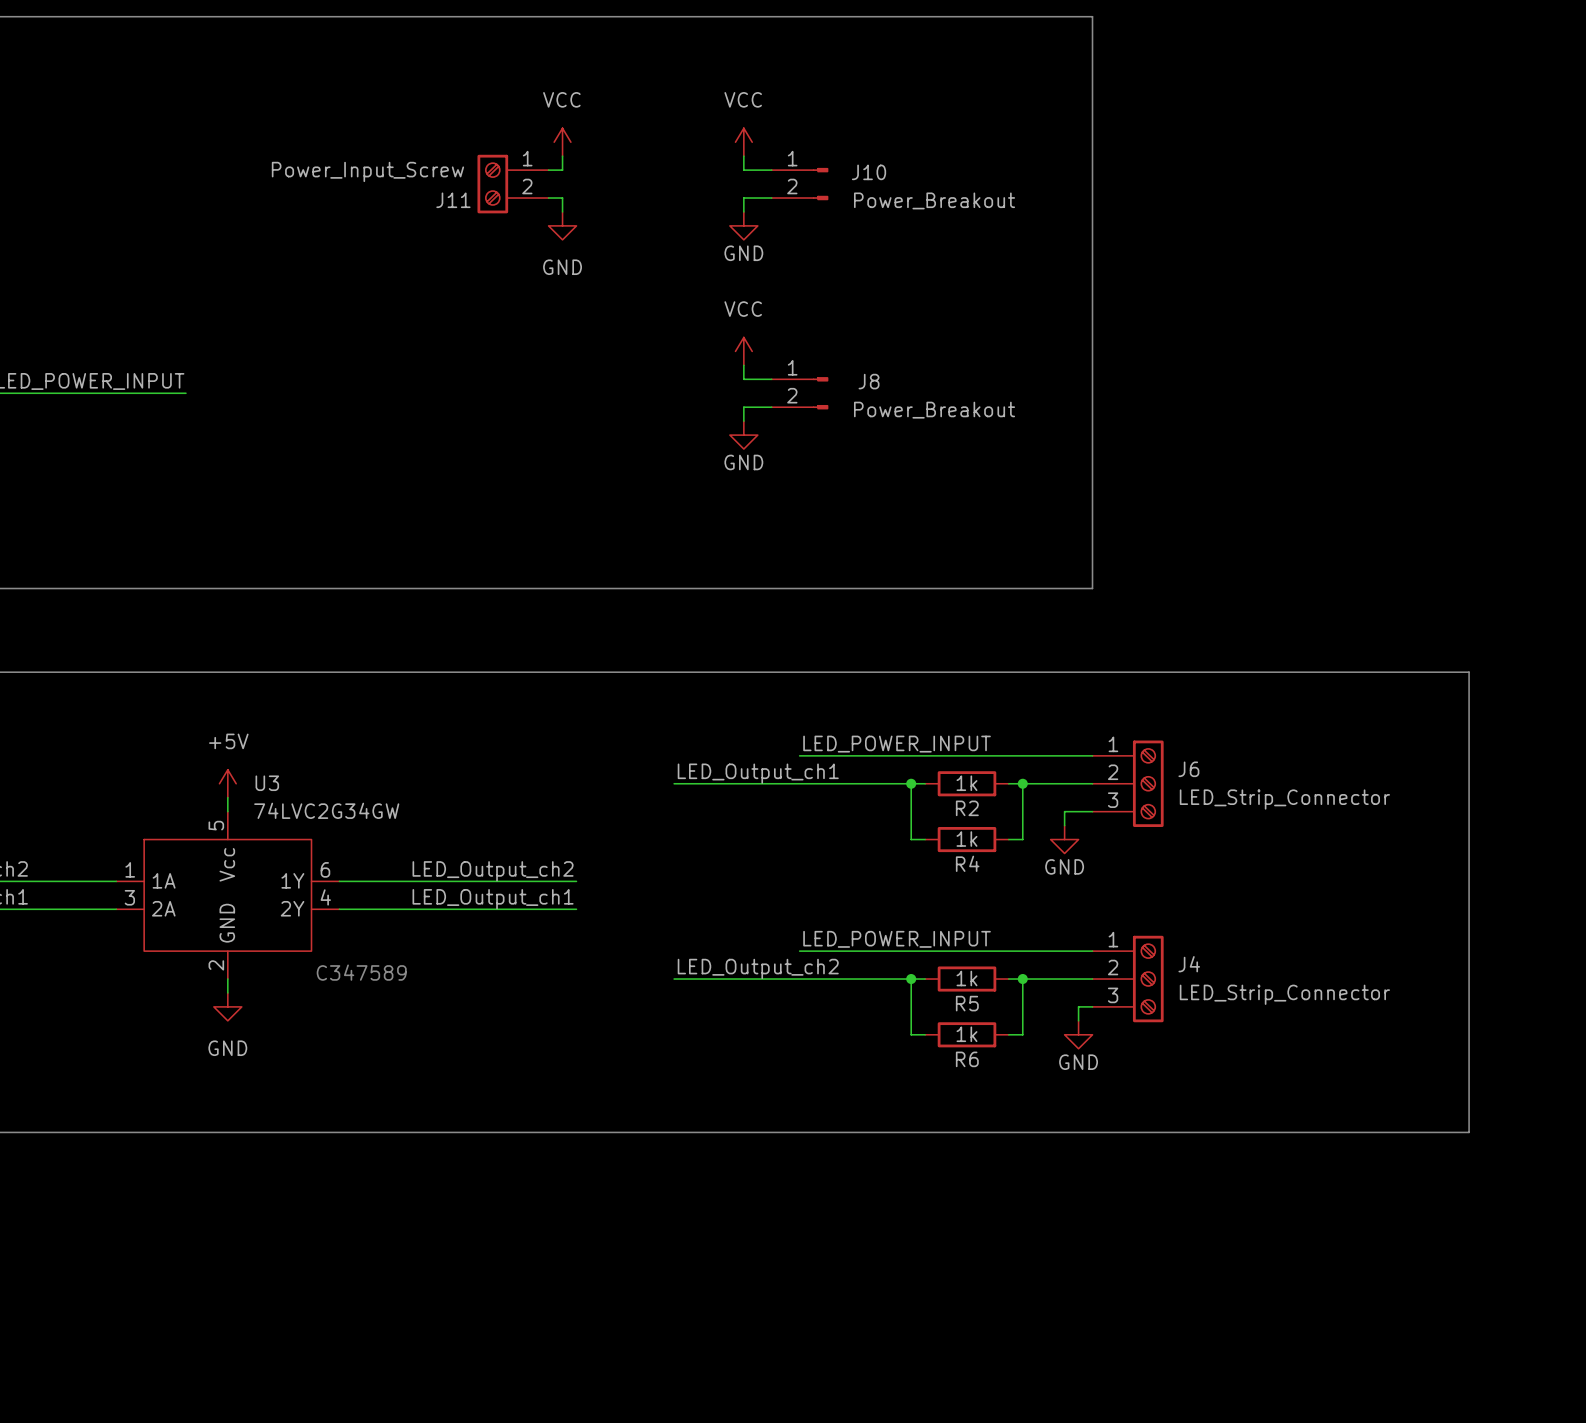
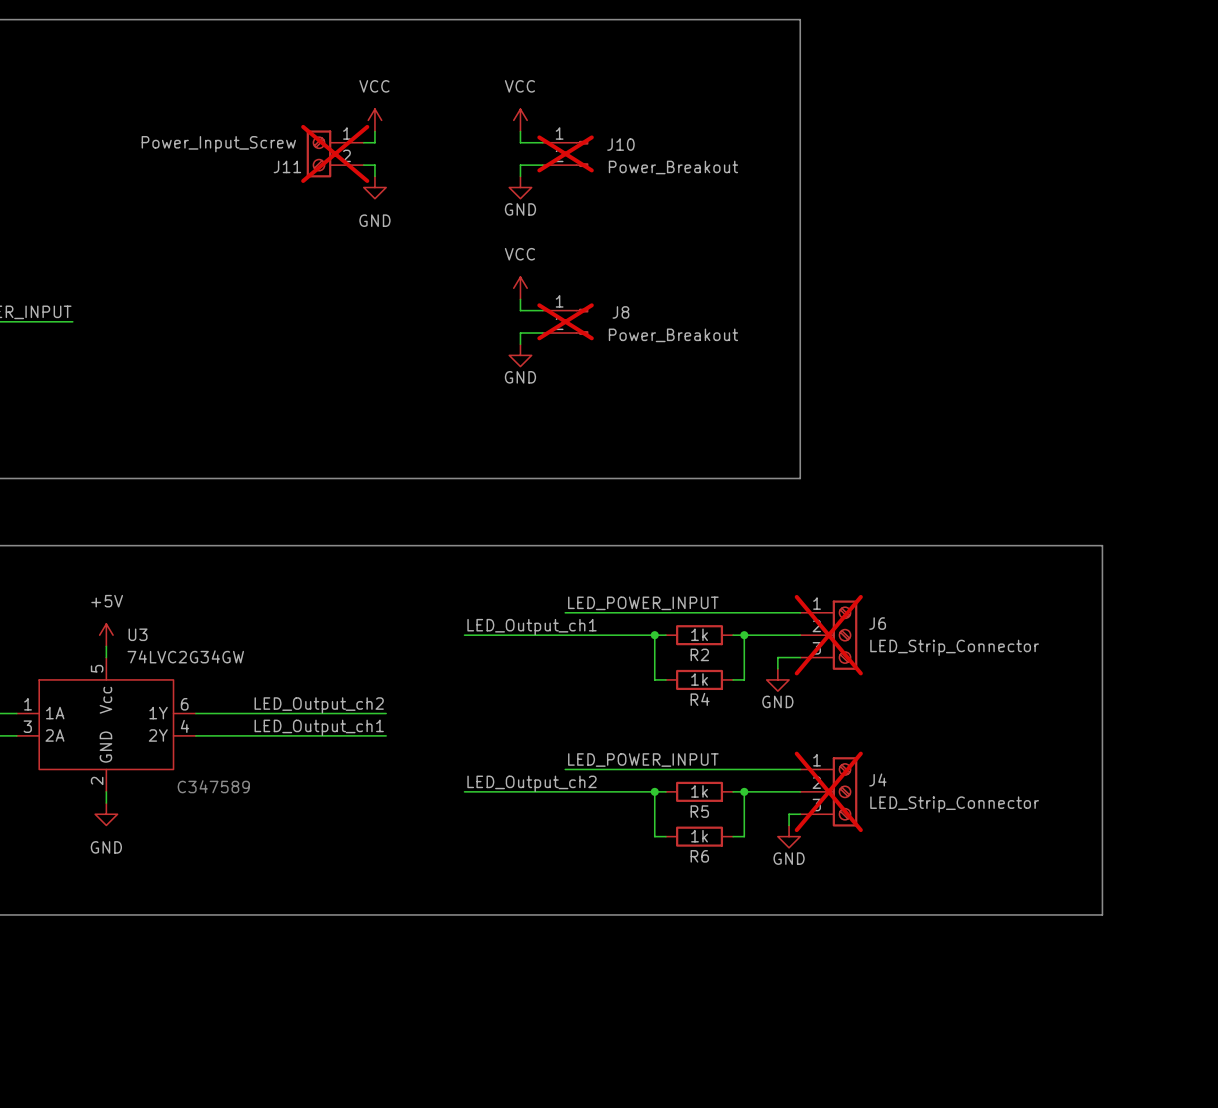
J11 do-not-place cross: none -> (335, 153)
J10 do-not-place cross: none -> (565, 153)
J8 do-not-place cross: none -> (565, 321)
J6 do-not-place cross: none -> (828, 635)
J4 do-not-place cross: none -> (828, 791)

